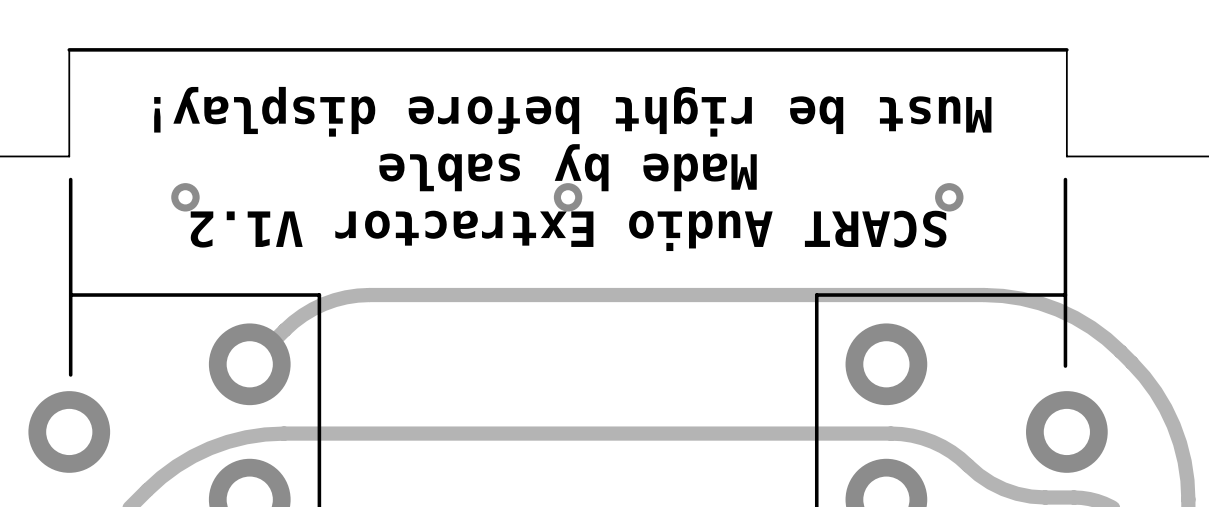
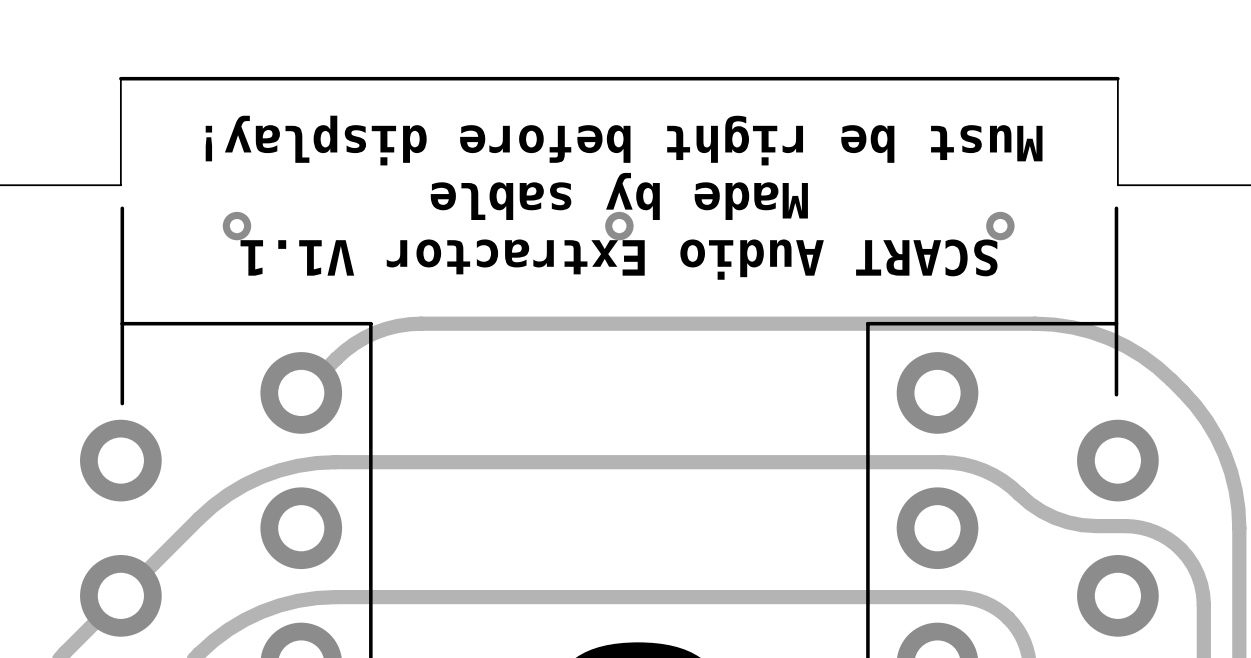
text: SCART Audio Extractor V1.2 (568, 230) -> SCART Audio Extractor V1.1 (619, 259)

